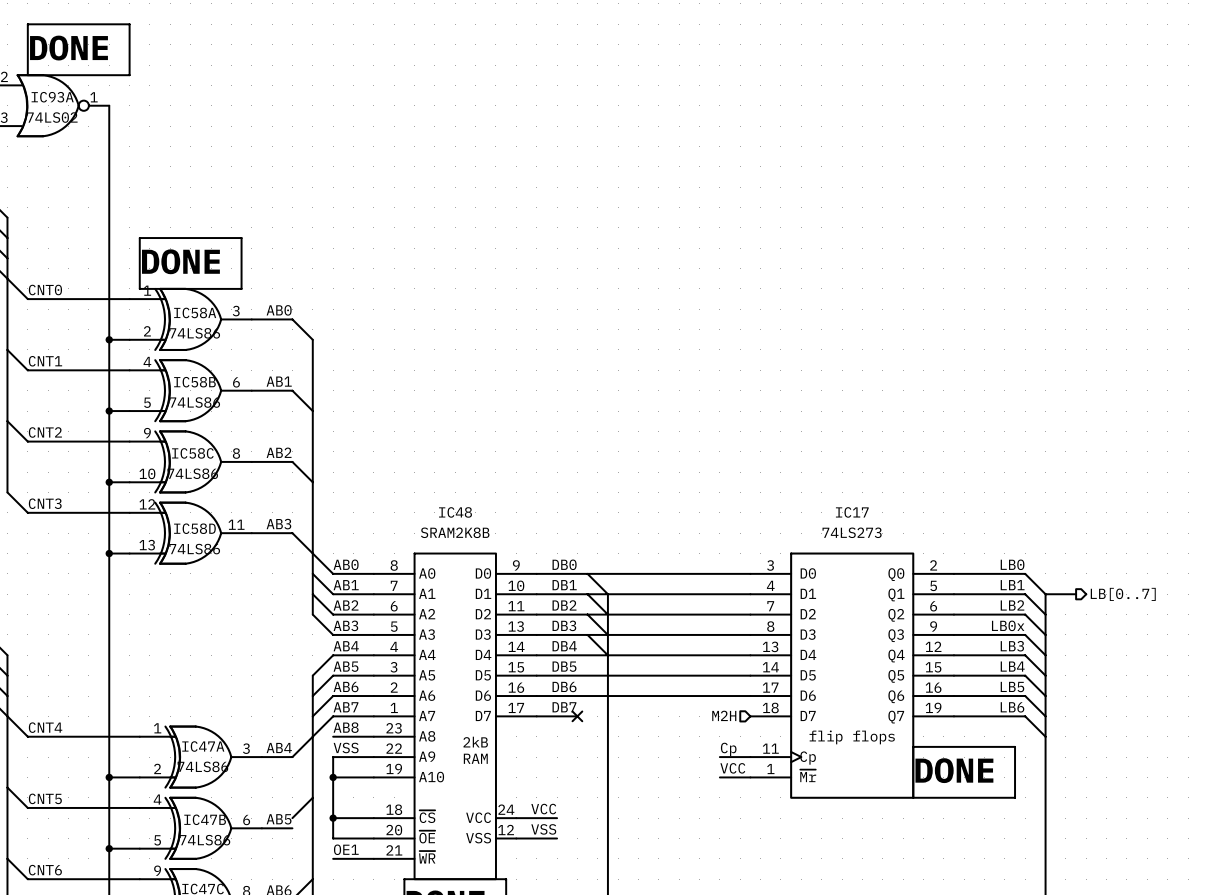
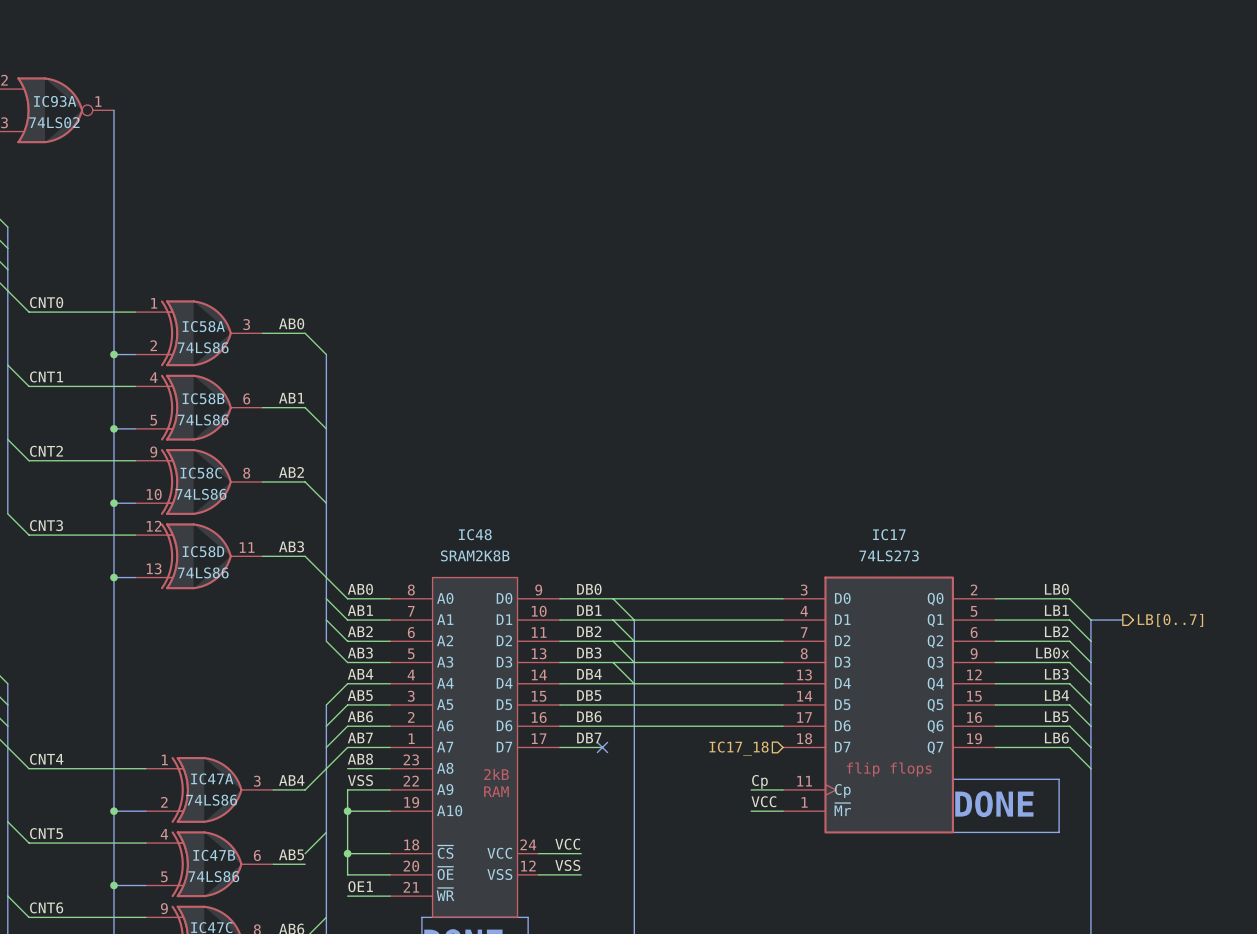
line: (27, 24) (129, 24) (129, 75) (27, 75) (27, 24) -> none
text: DONE (68, 48) -> none
line: (139, 238) (241, 238) (241, 288) (139, 288) (139, 238) -> none
text: DONE (180, 261) -> none
hierarchical label: M2H (724, 715) -> IC17_18 (739, 748)

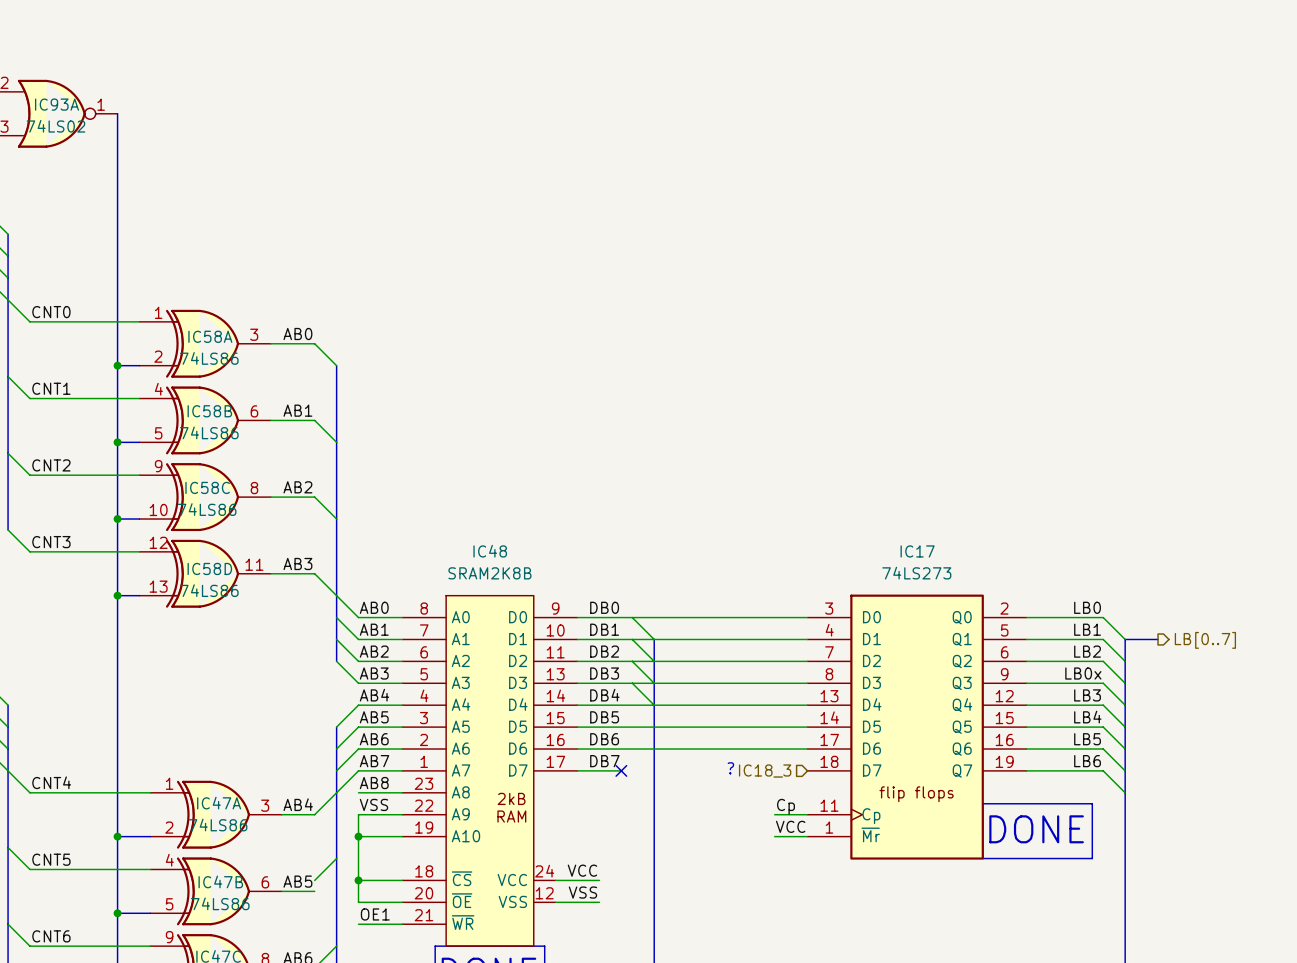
text: none -> ? (730, 768)
hierarchical label: IC17_18 (739, 748) -> IC18_3 (765, 771)

